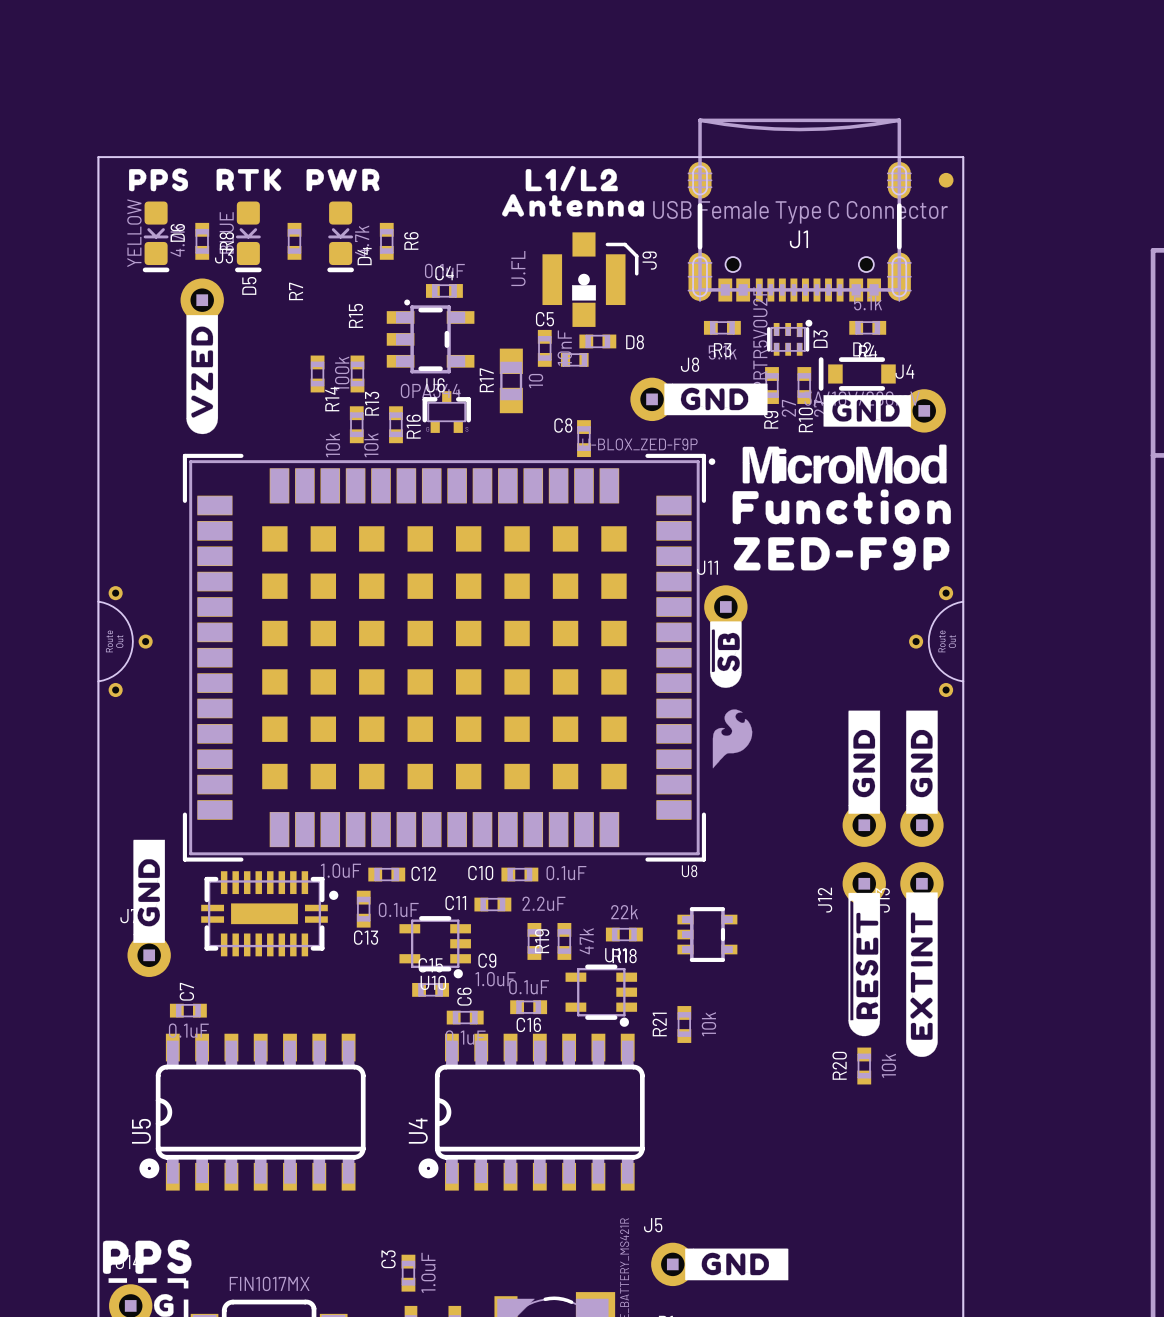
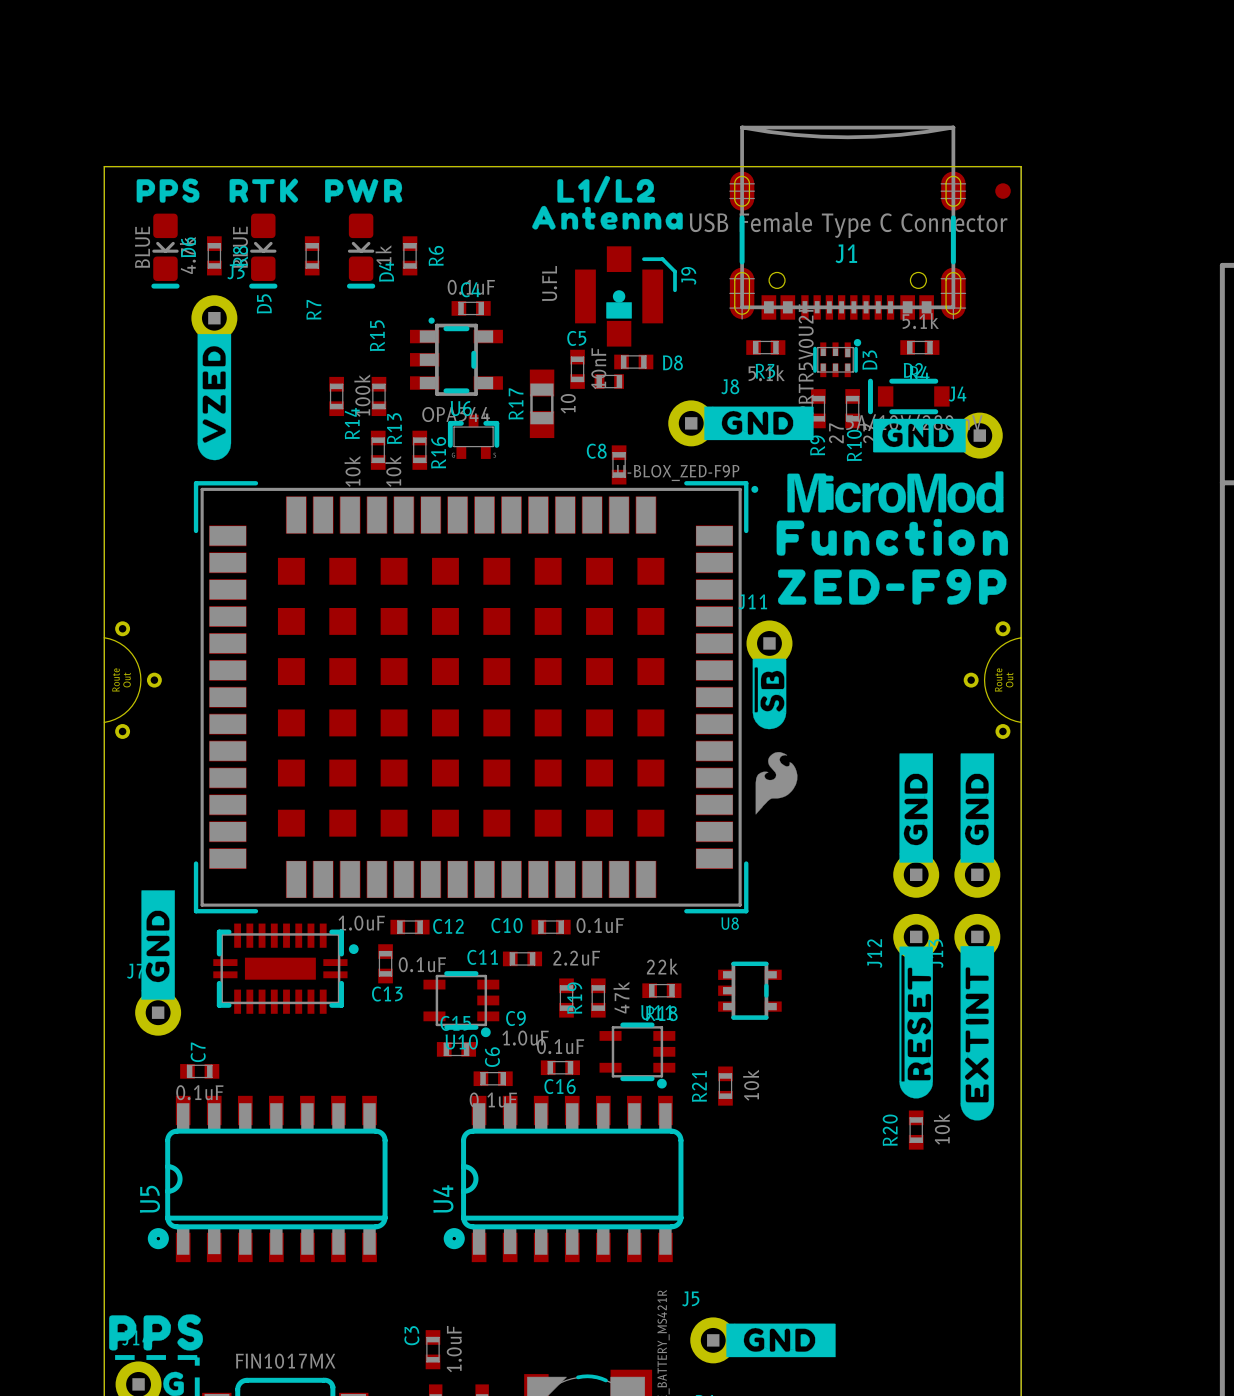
D6 value: YELLOW (134, 233) -> BLUE (142, 247)
R6 value: 4.7k (362, 241) -> 1k (383, 254)

